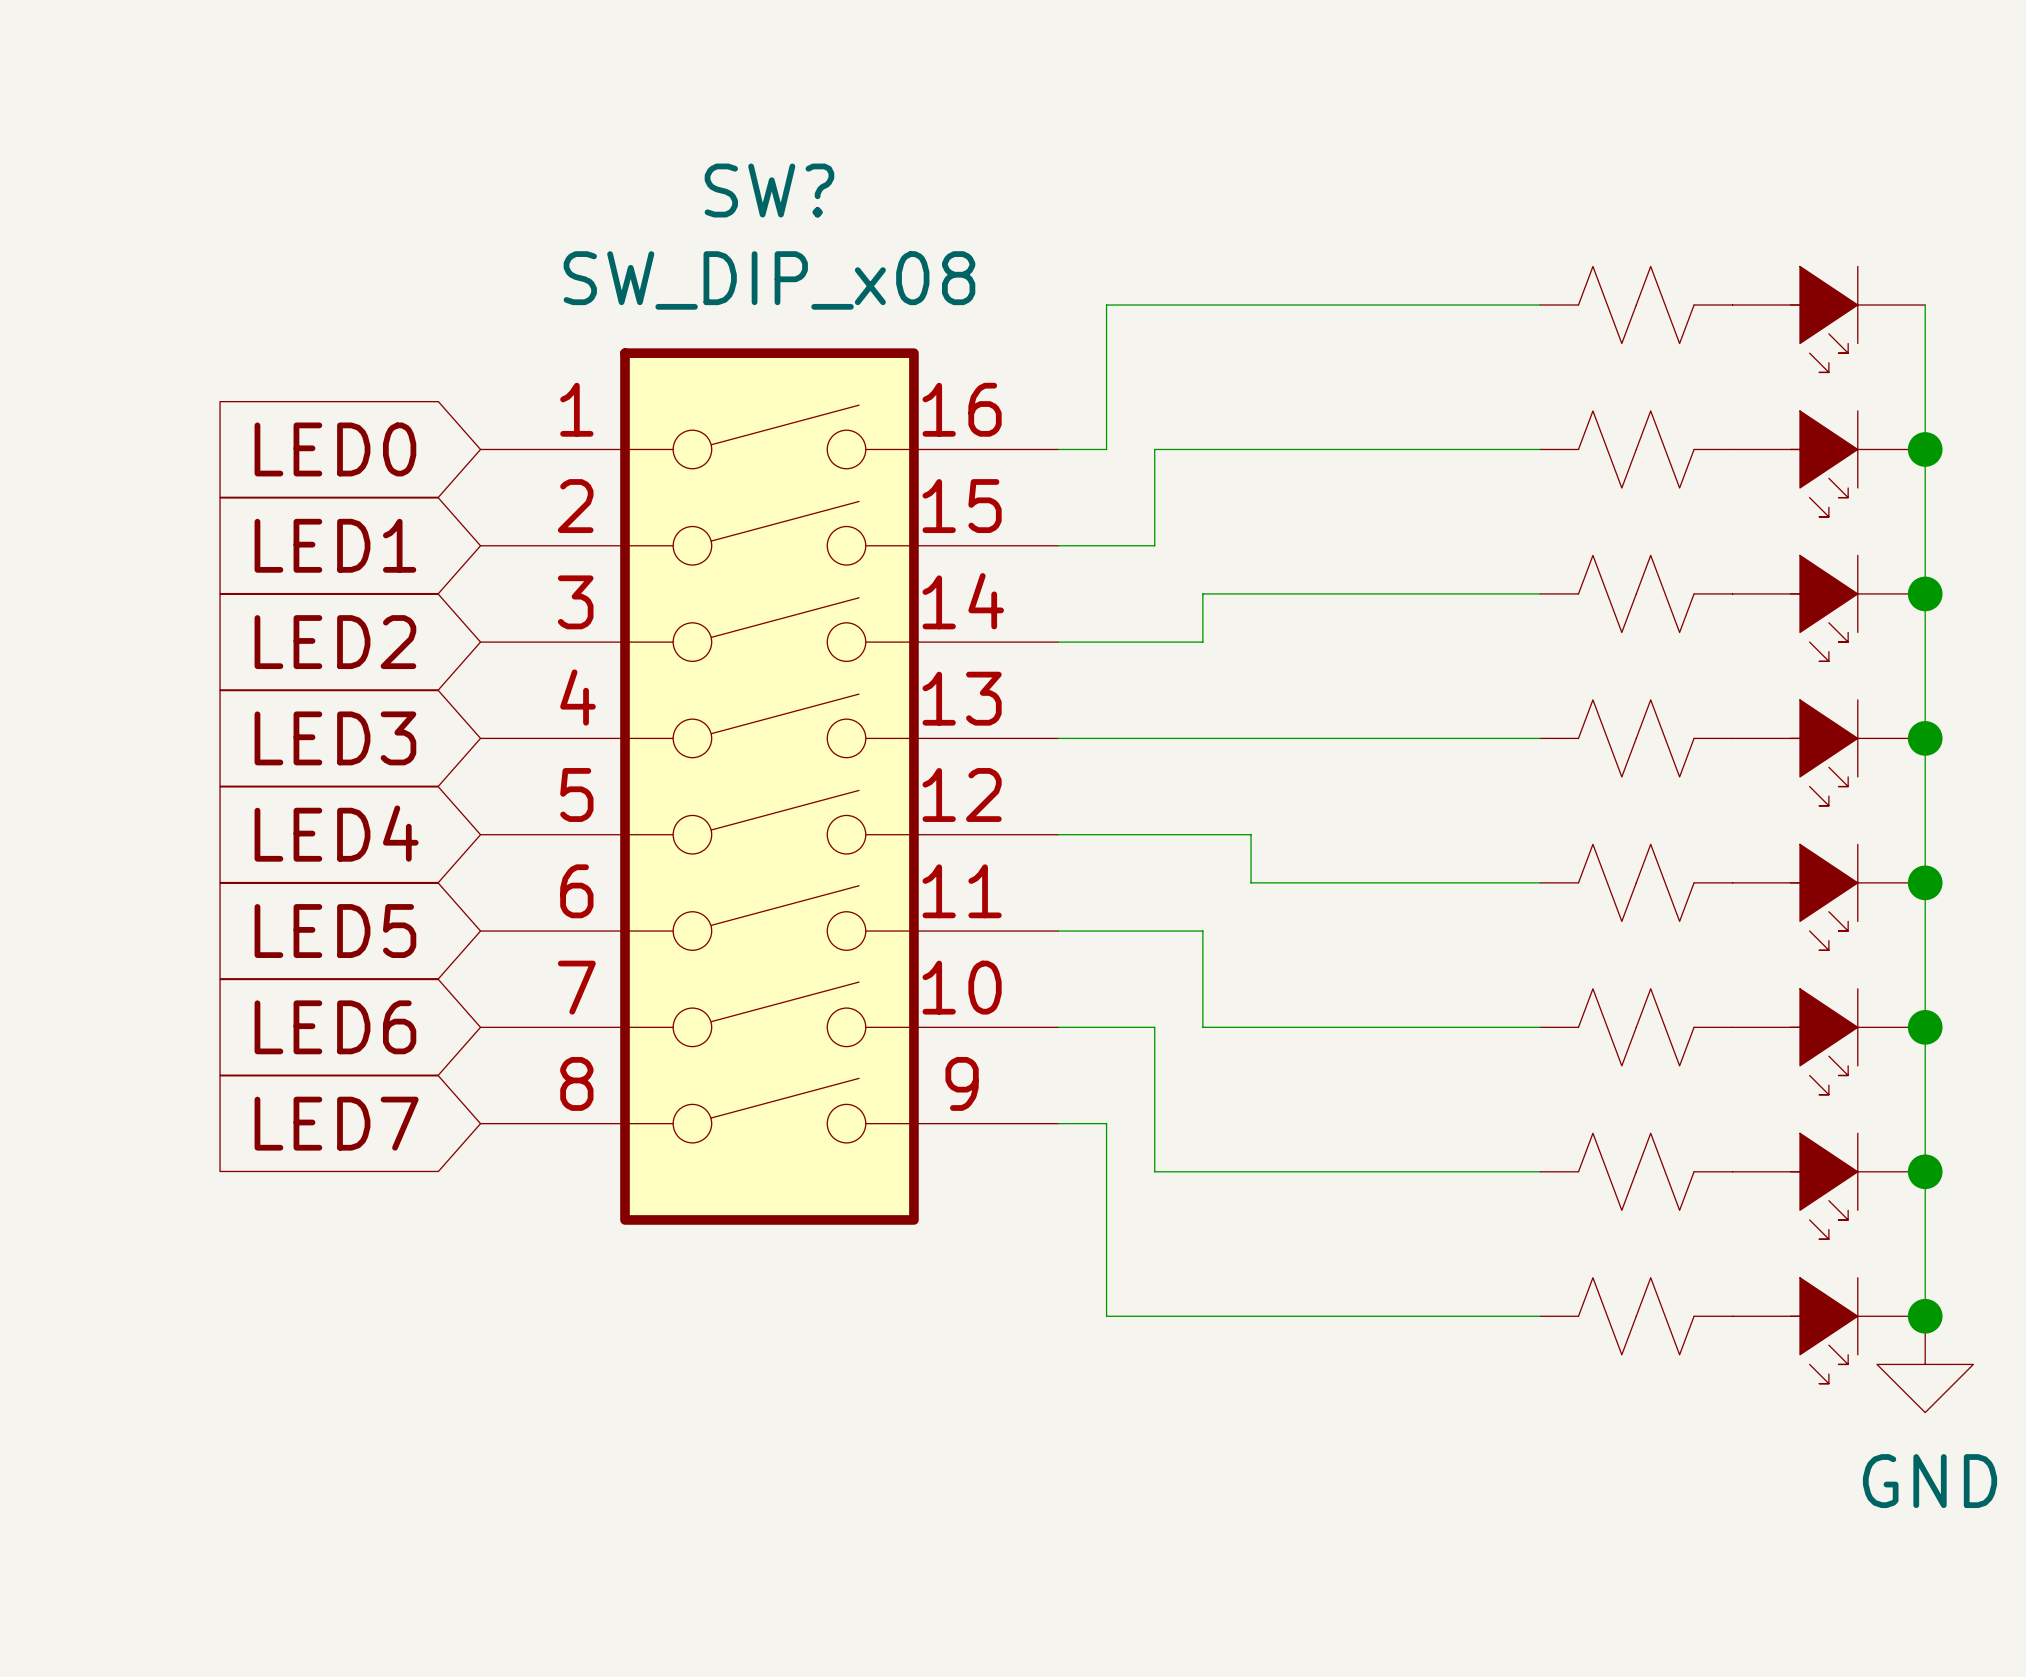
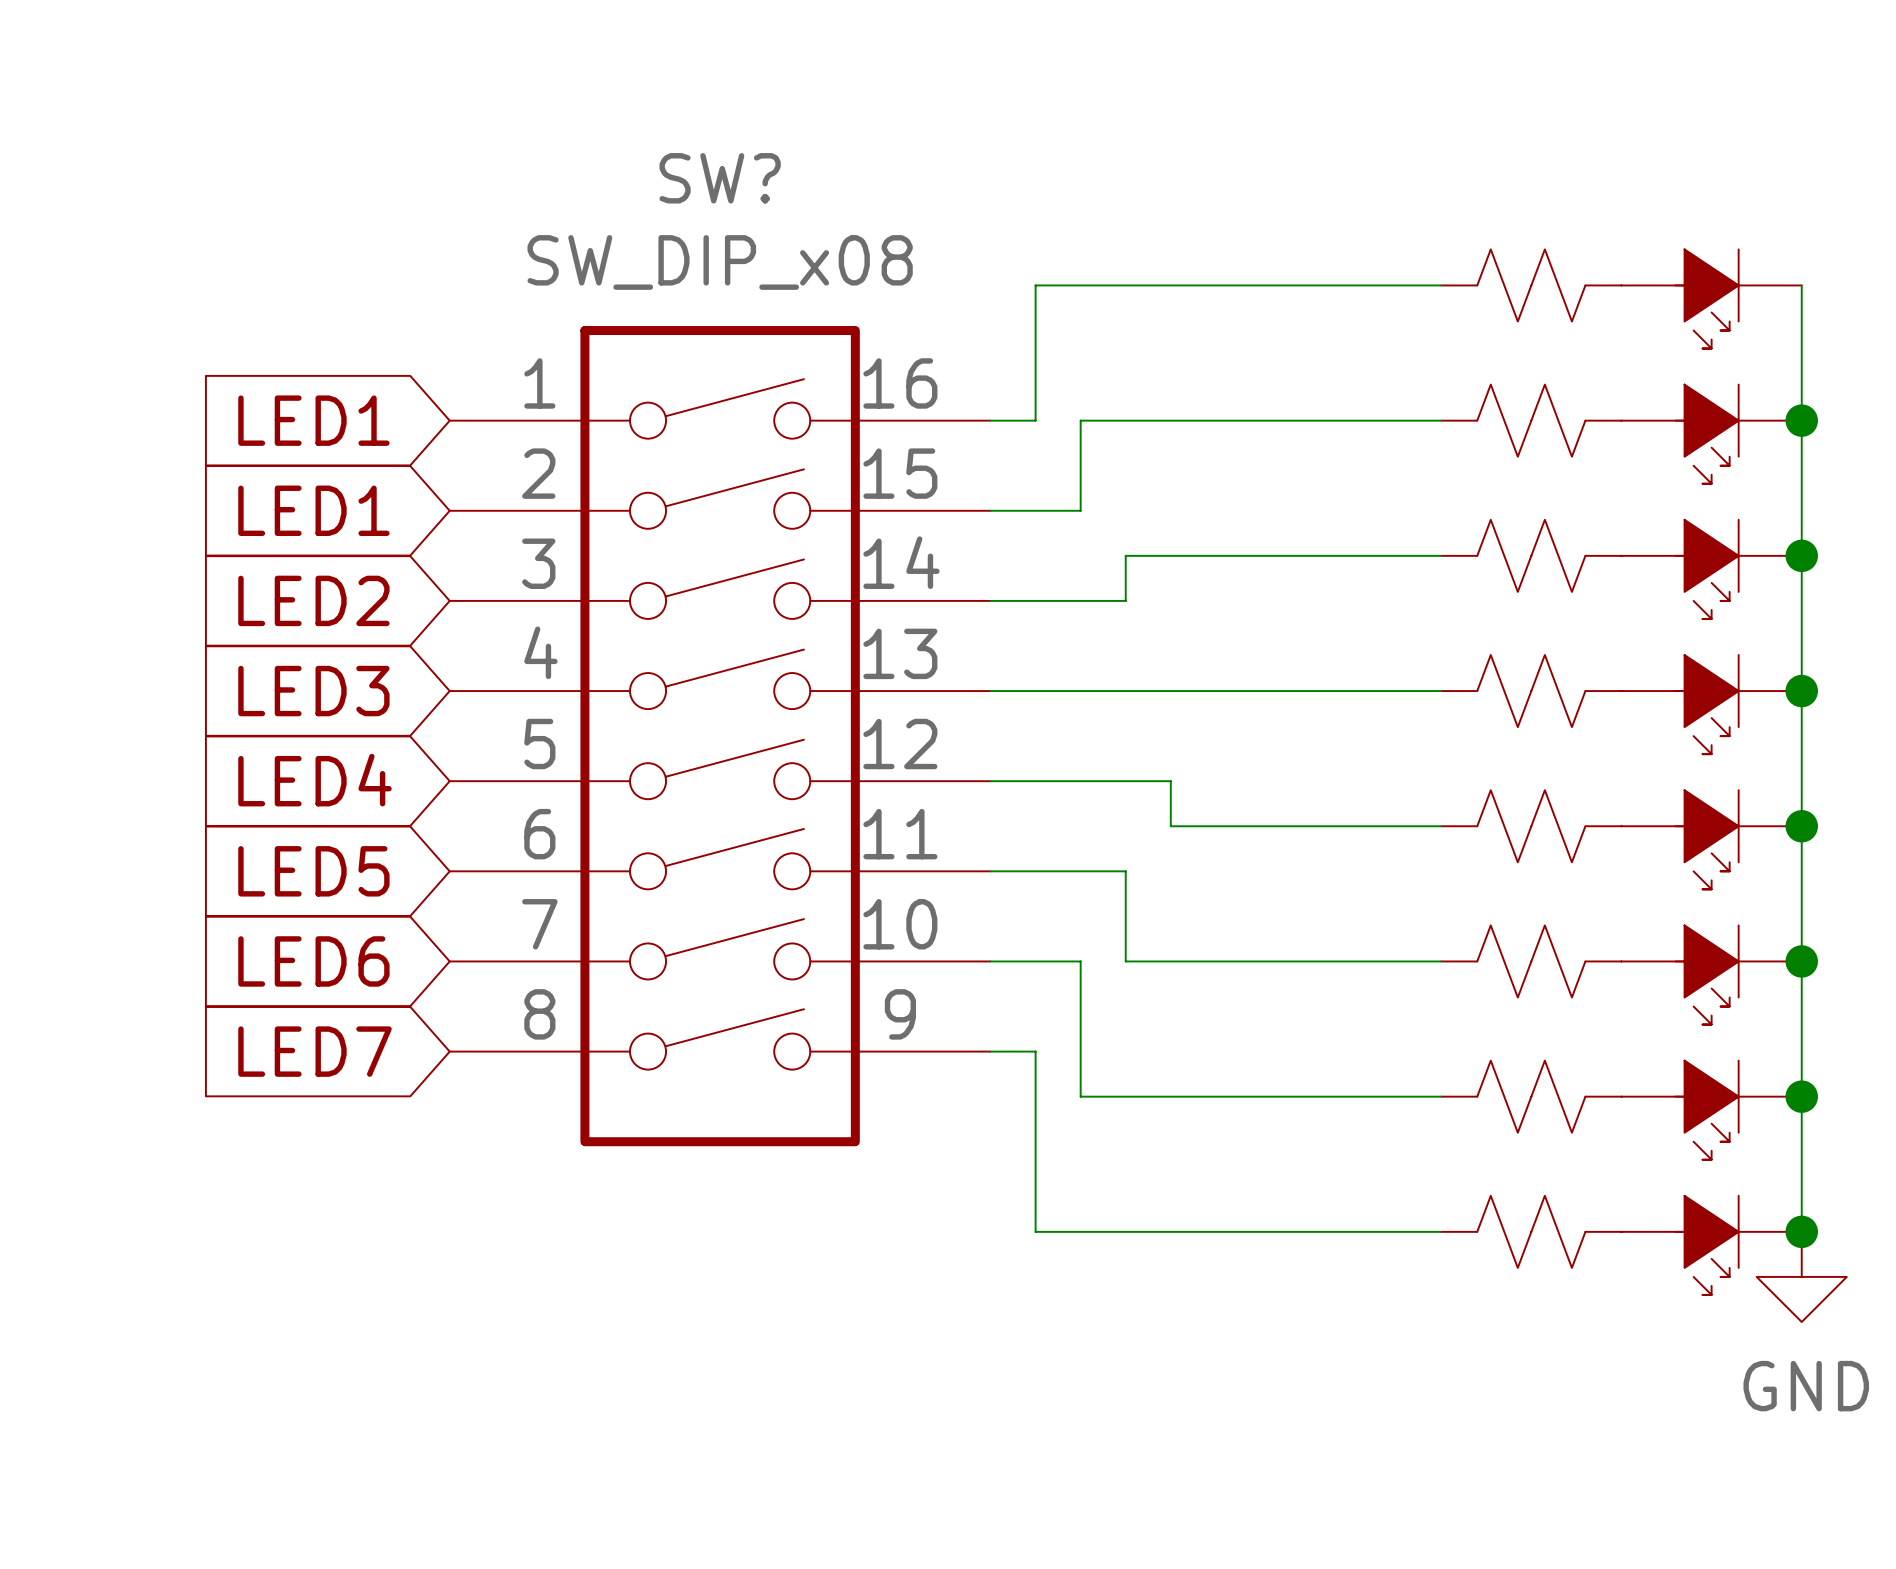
global label: LED0 (335, 449) -> LED1 (313, 420)

